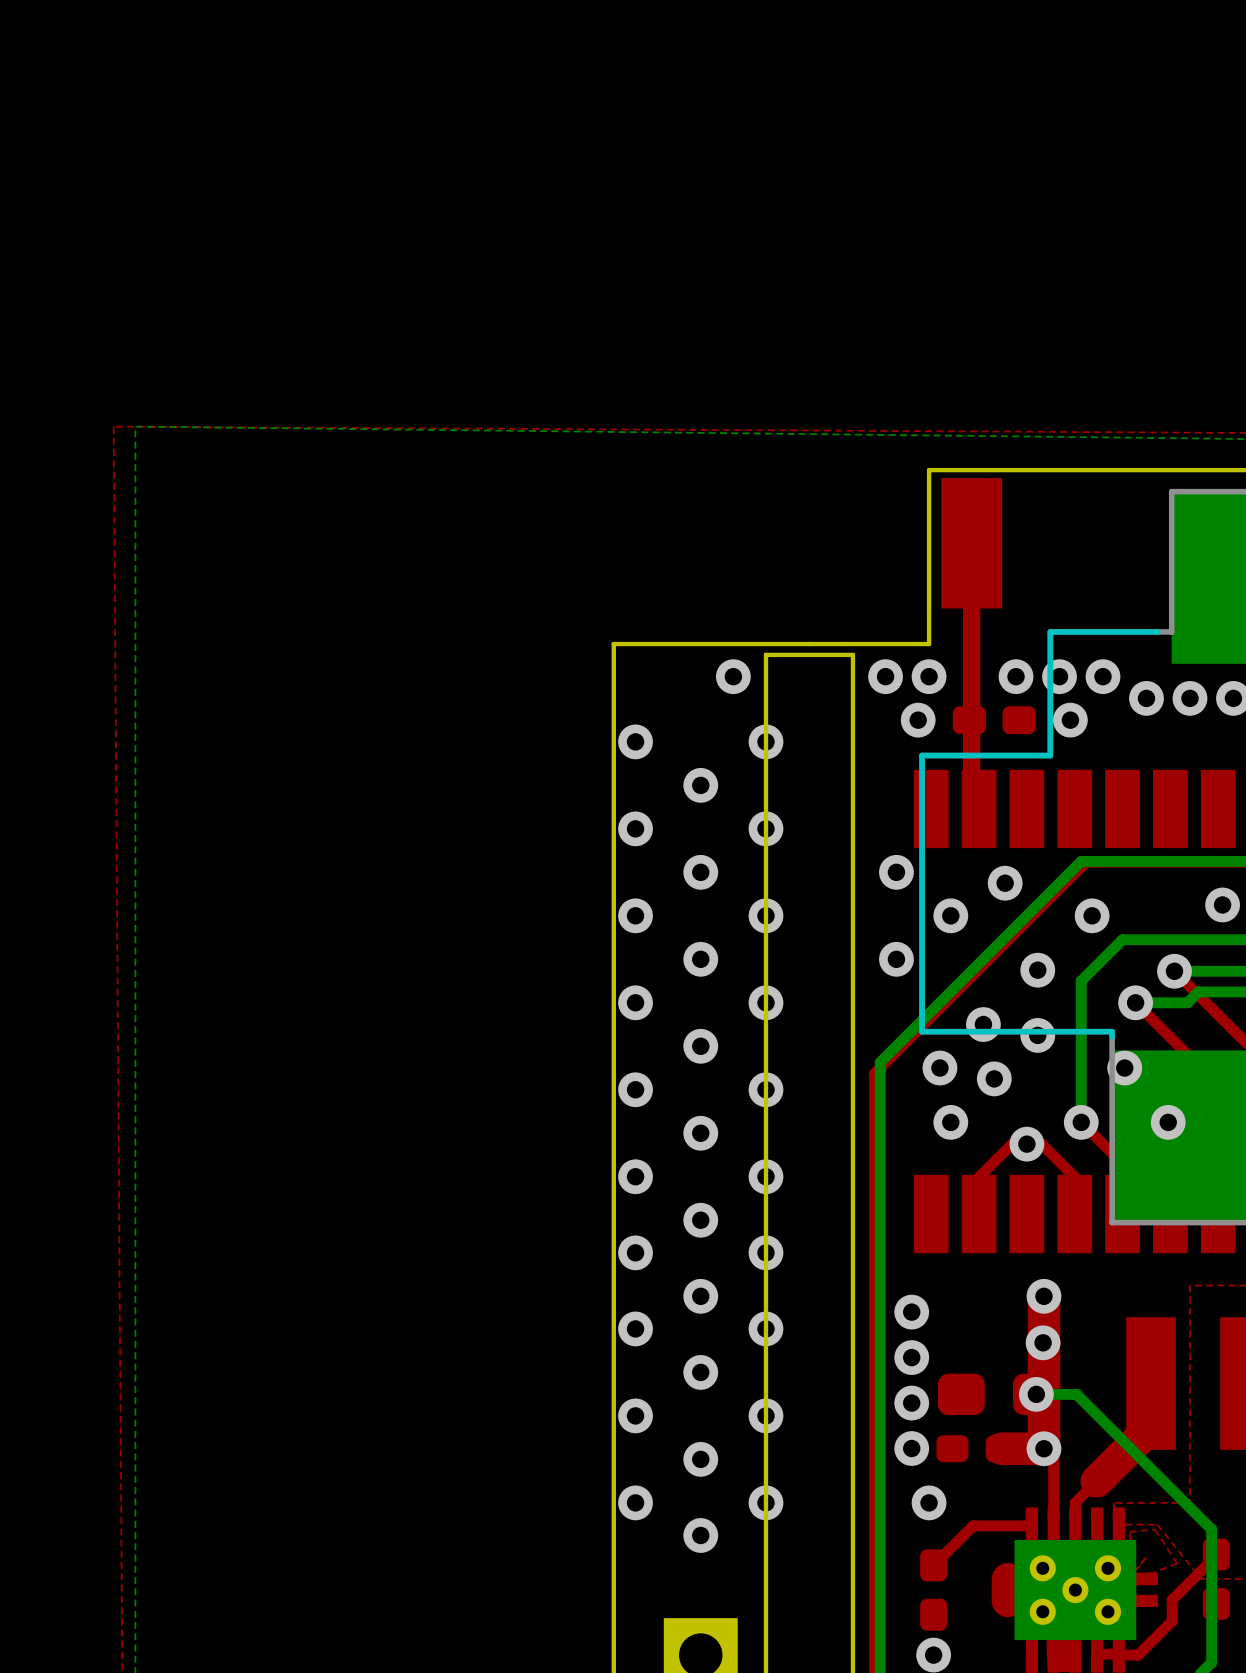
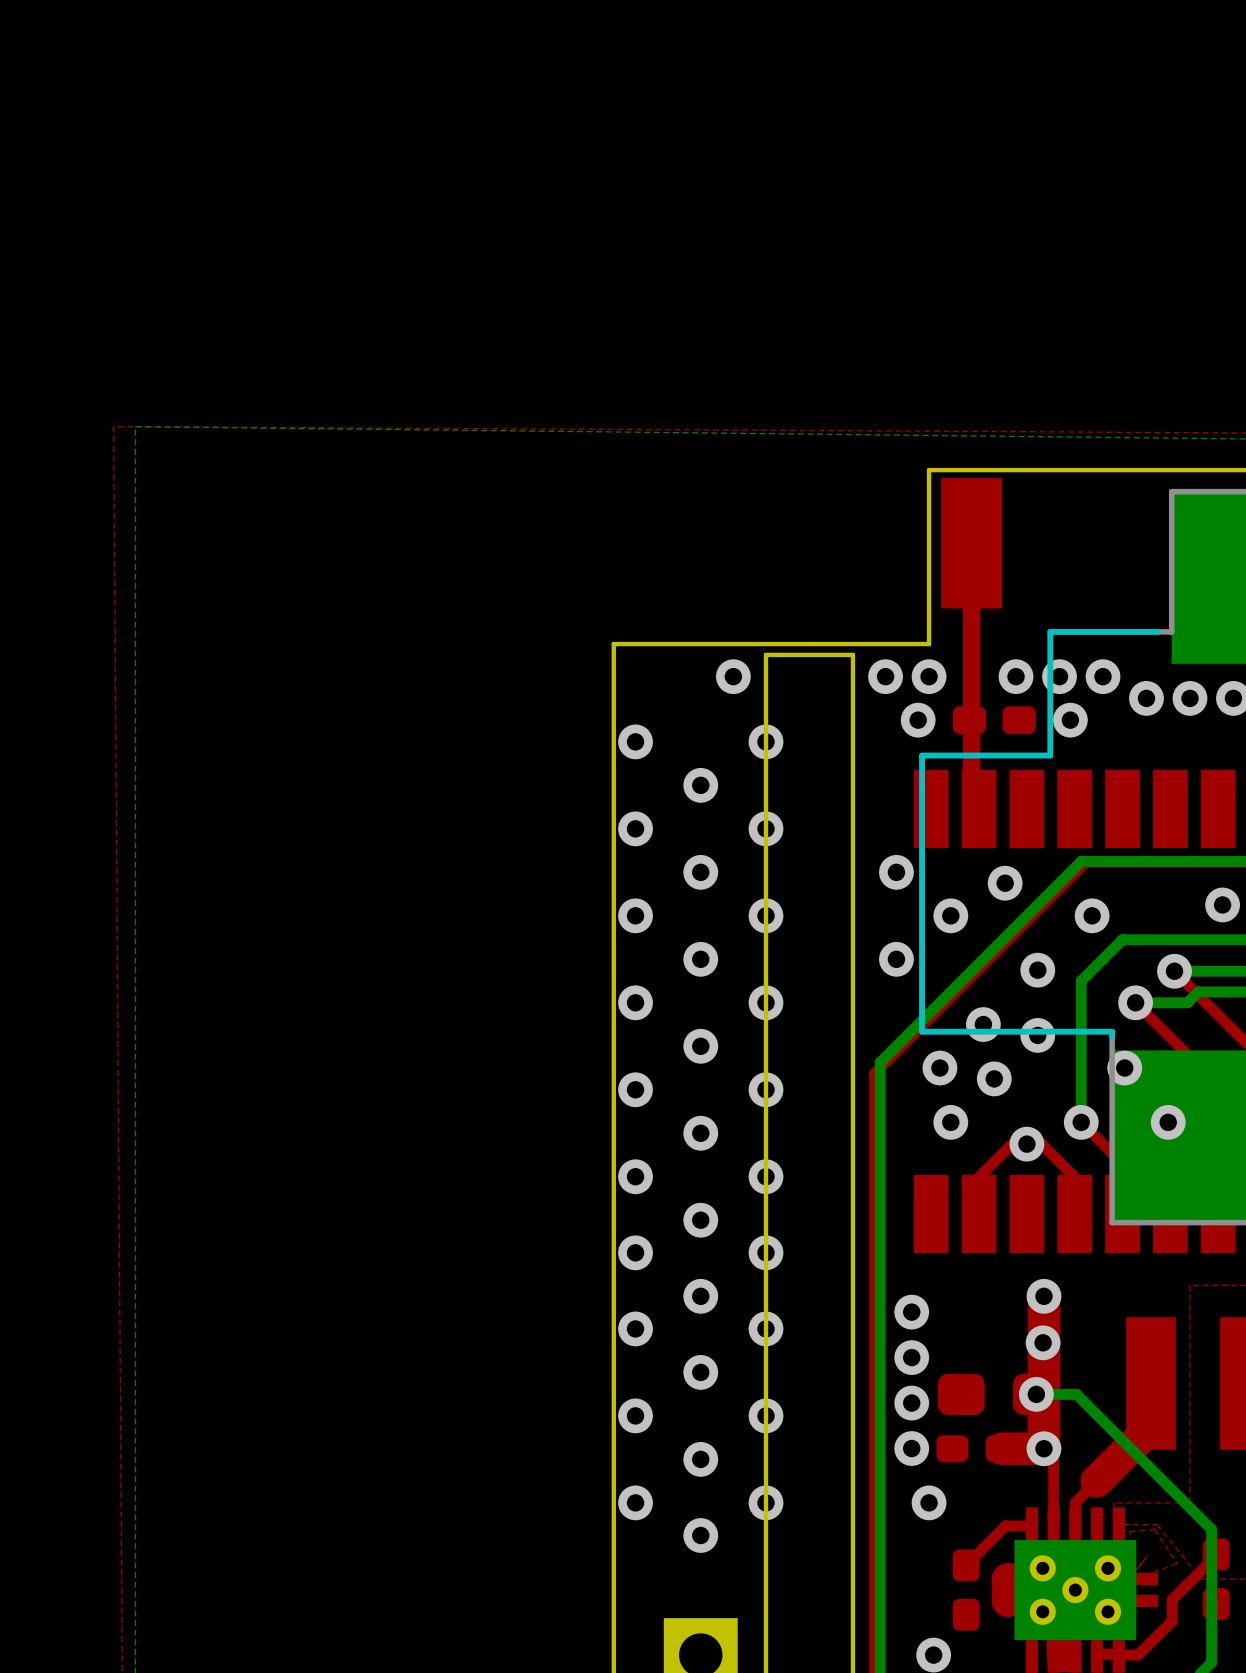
top track: (1005, 1525) (973, 1525) (933, 1565) -> (1005, 1525) (966, 1565)
part position: (933, 1590) -> (966, 1590)

